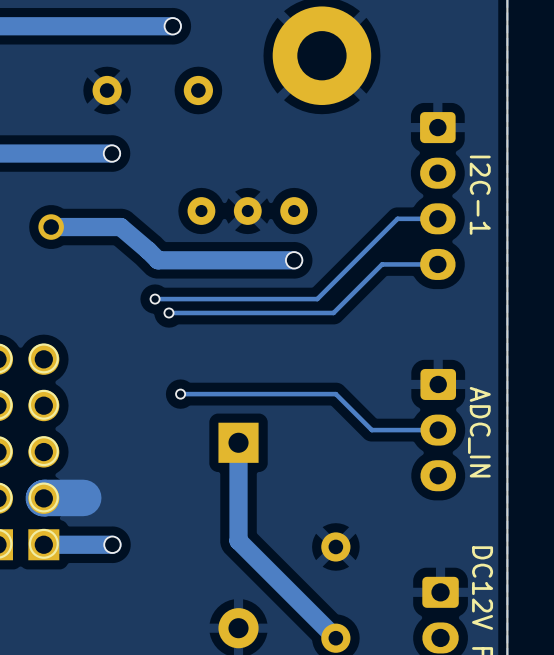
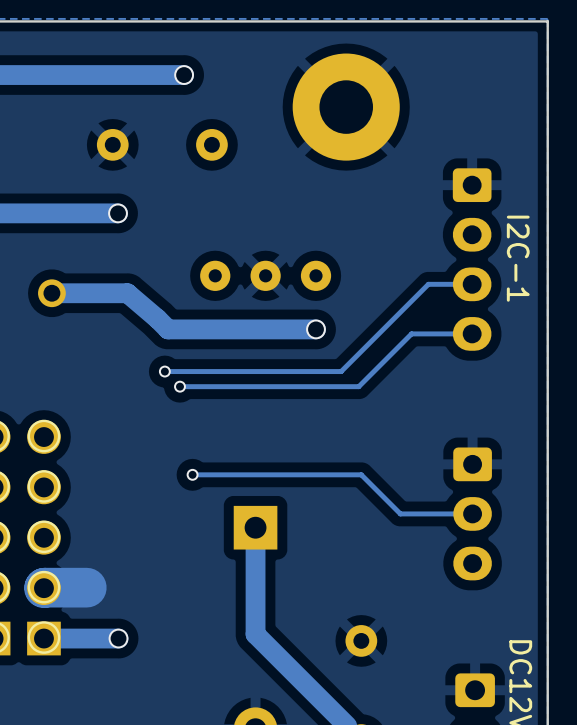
part value: ADC_IN (479, 432) -> none

